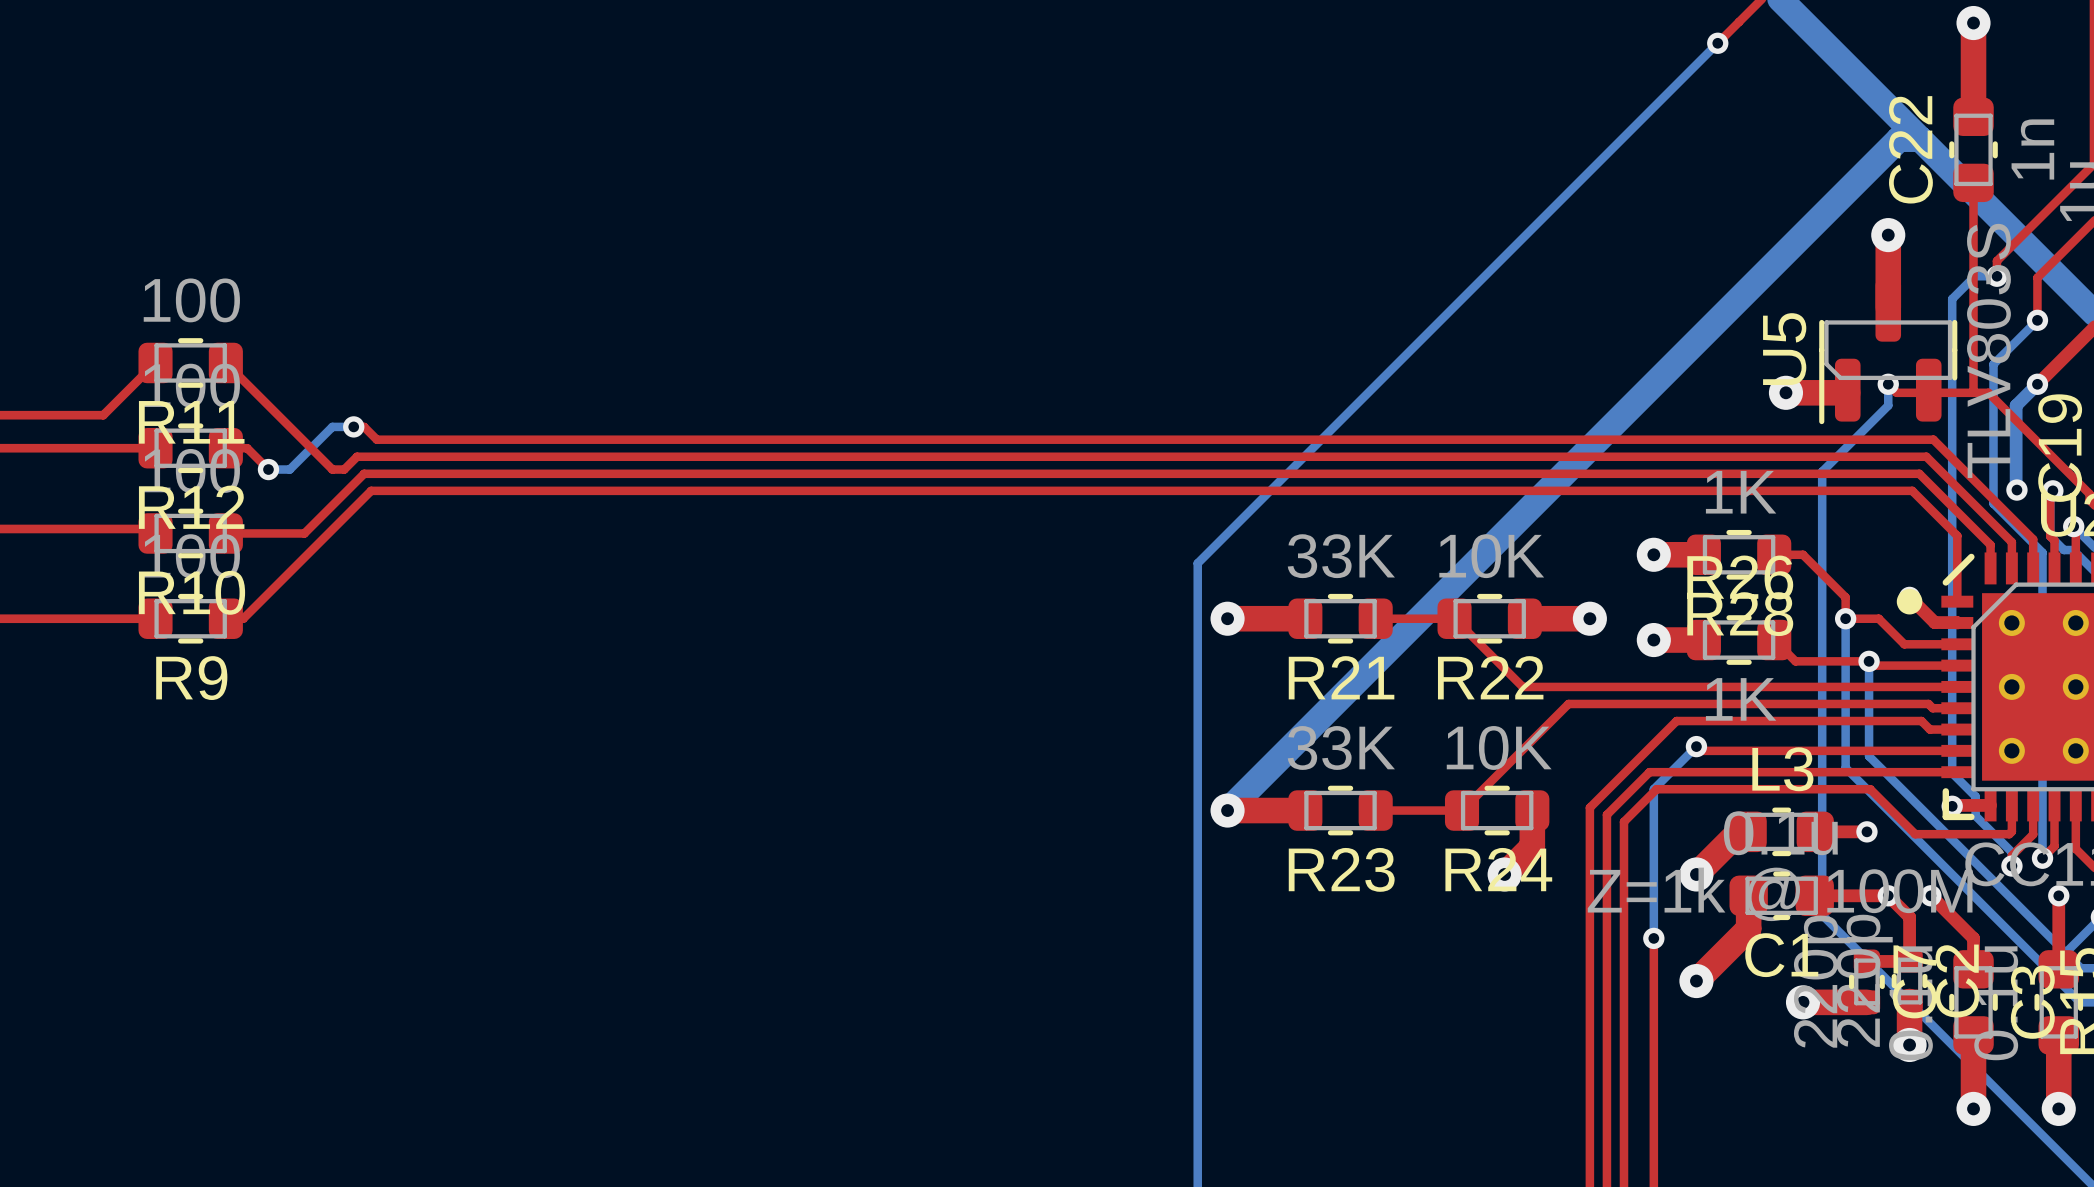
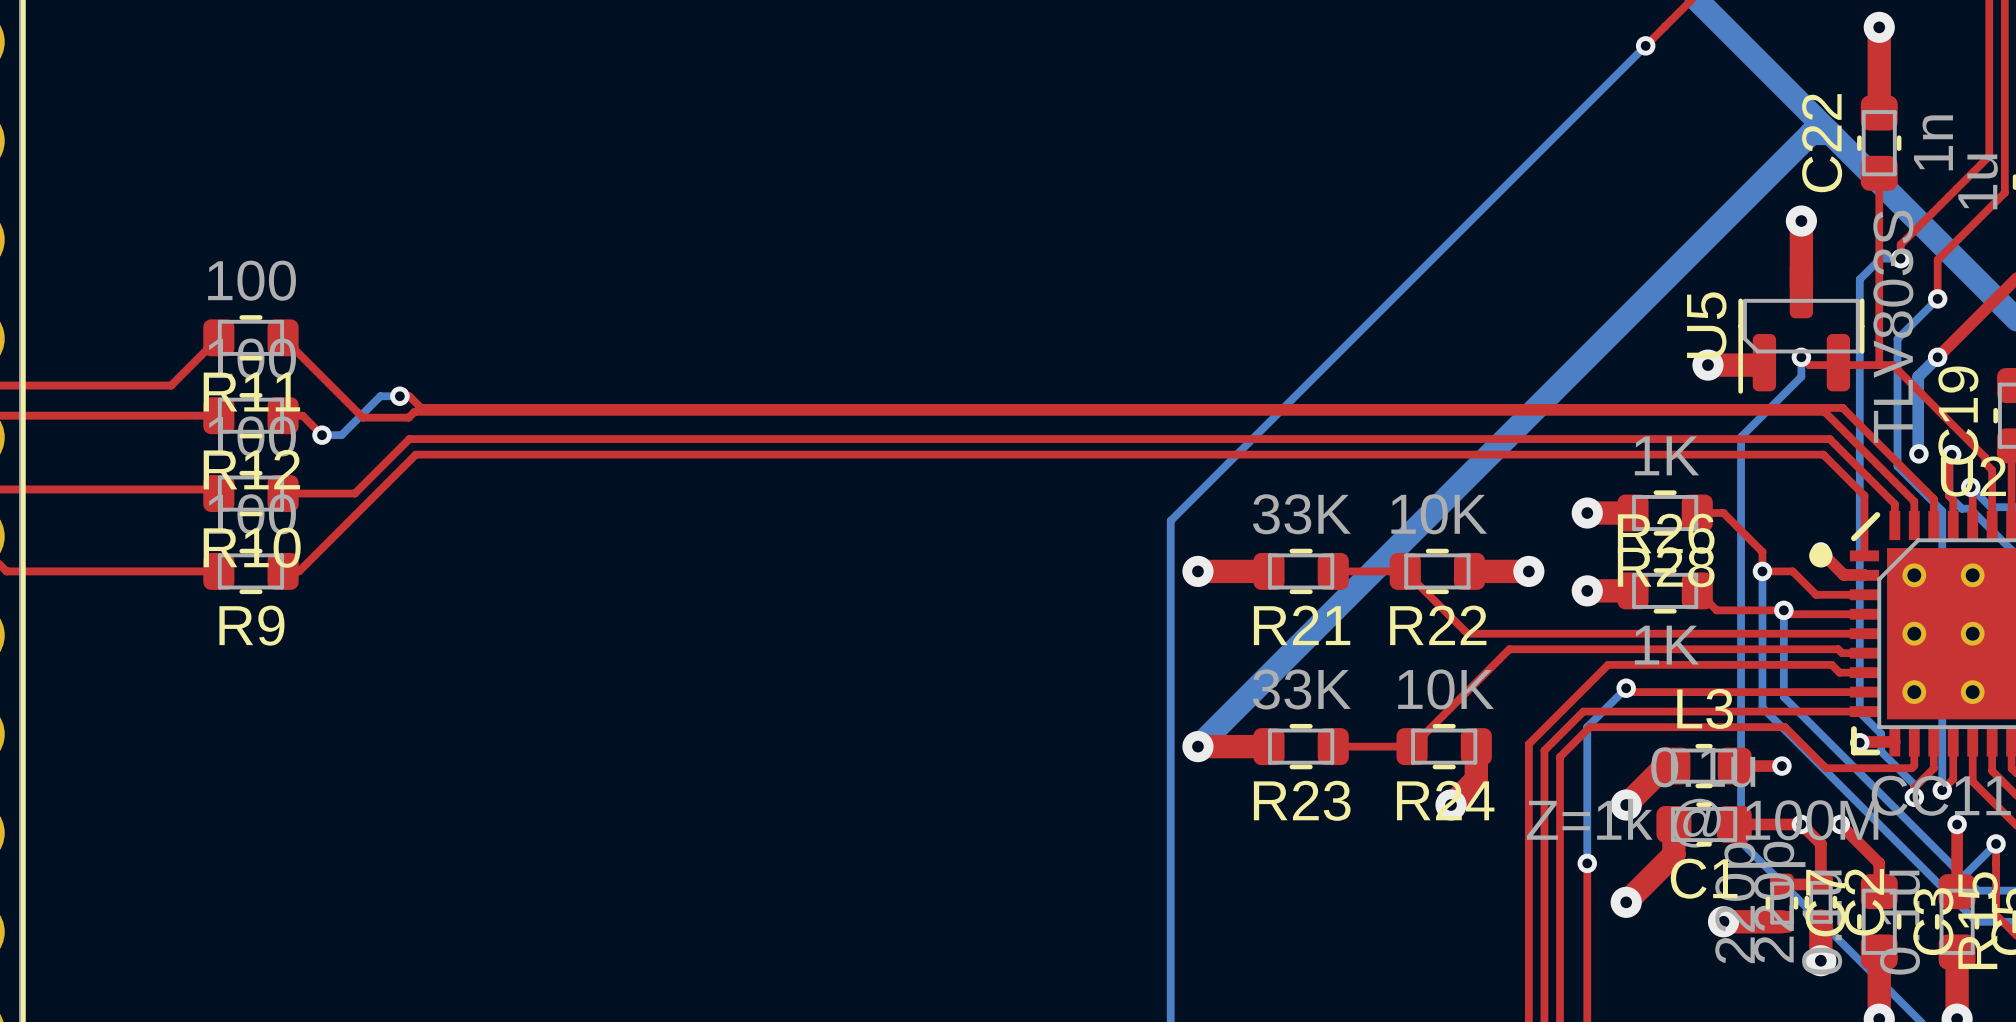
top track: (313, 450) (332, 469) (344, 469) (357, 456) (1926, 456) -> (362, 417) (408, 417) (414, 411) (1824, 411) (1836, 423)

